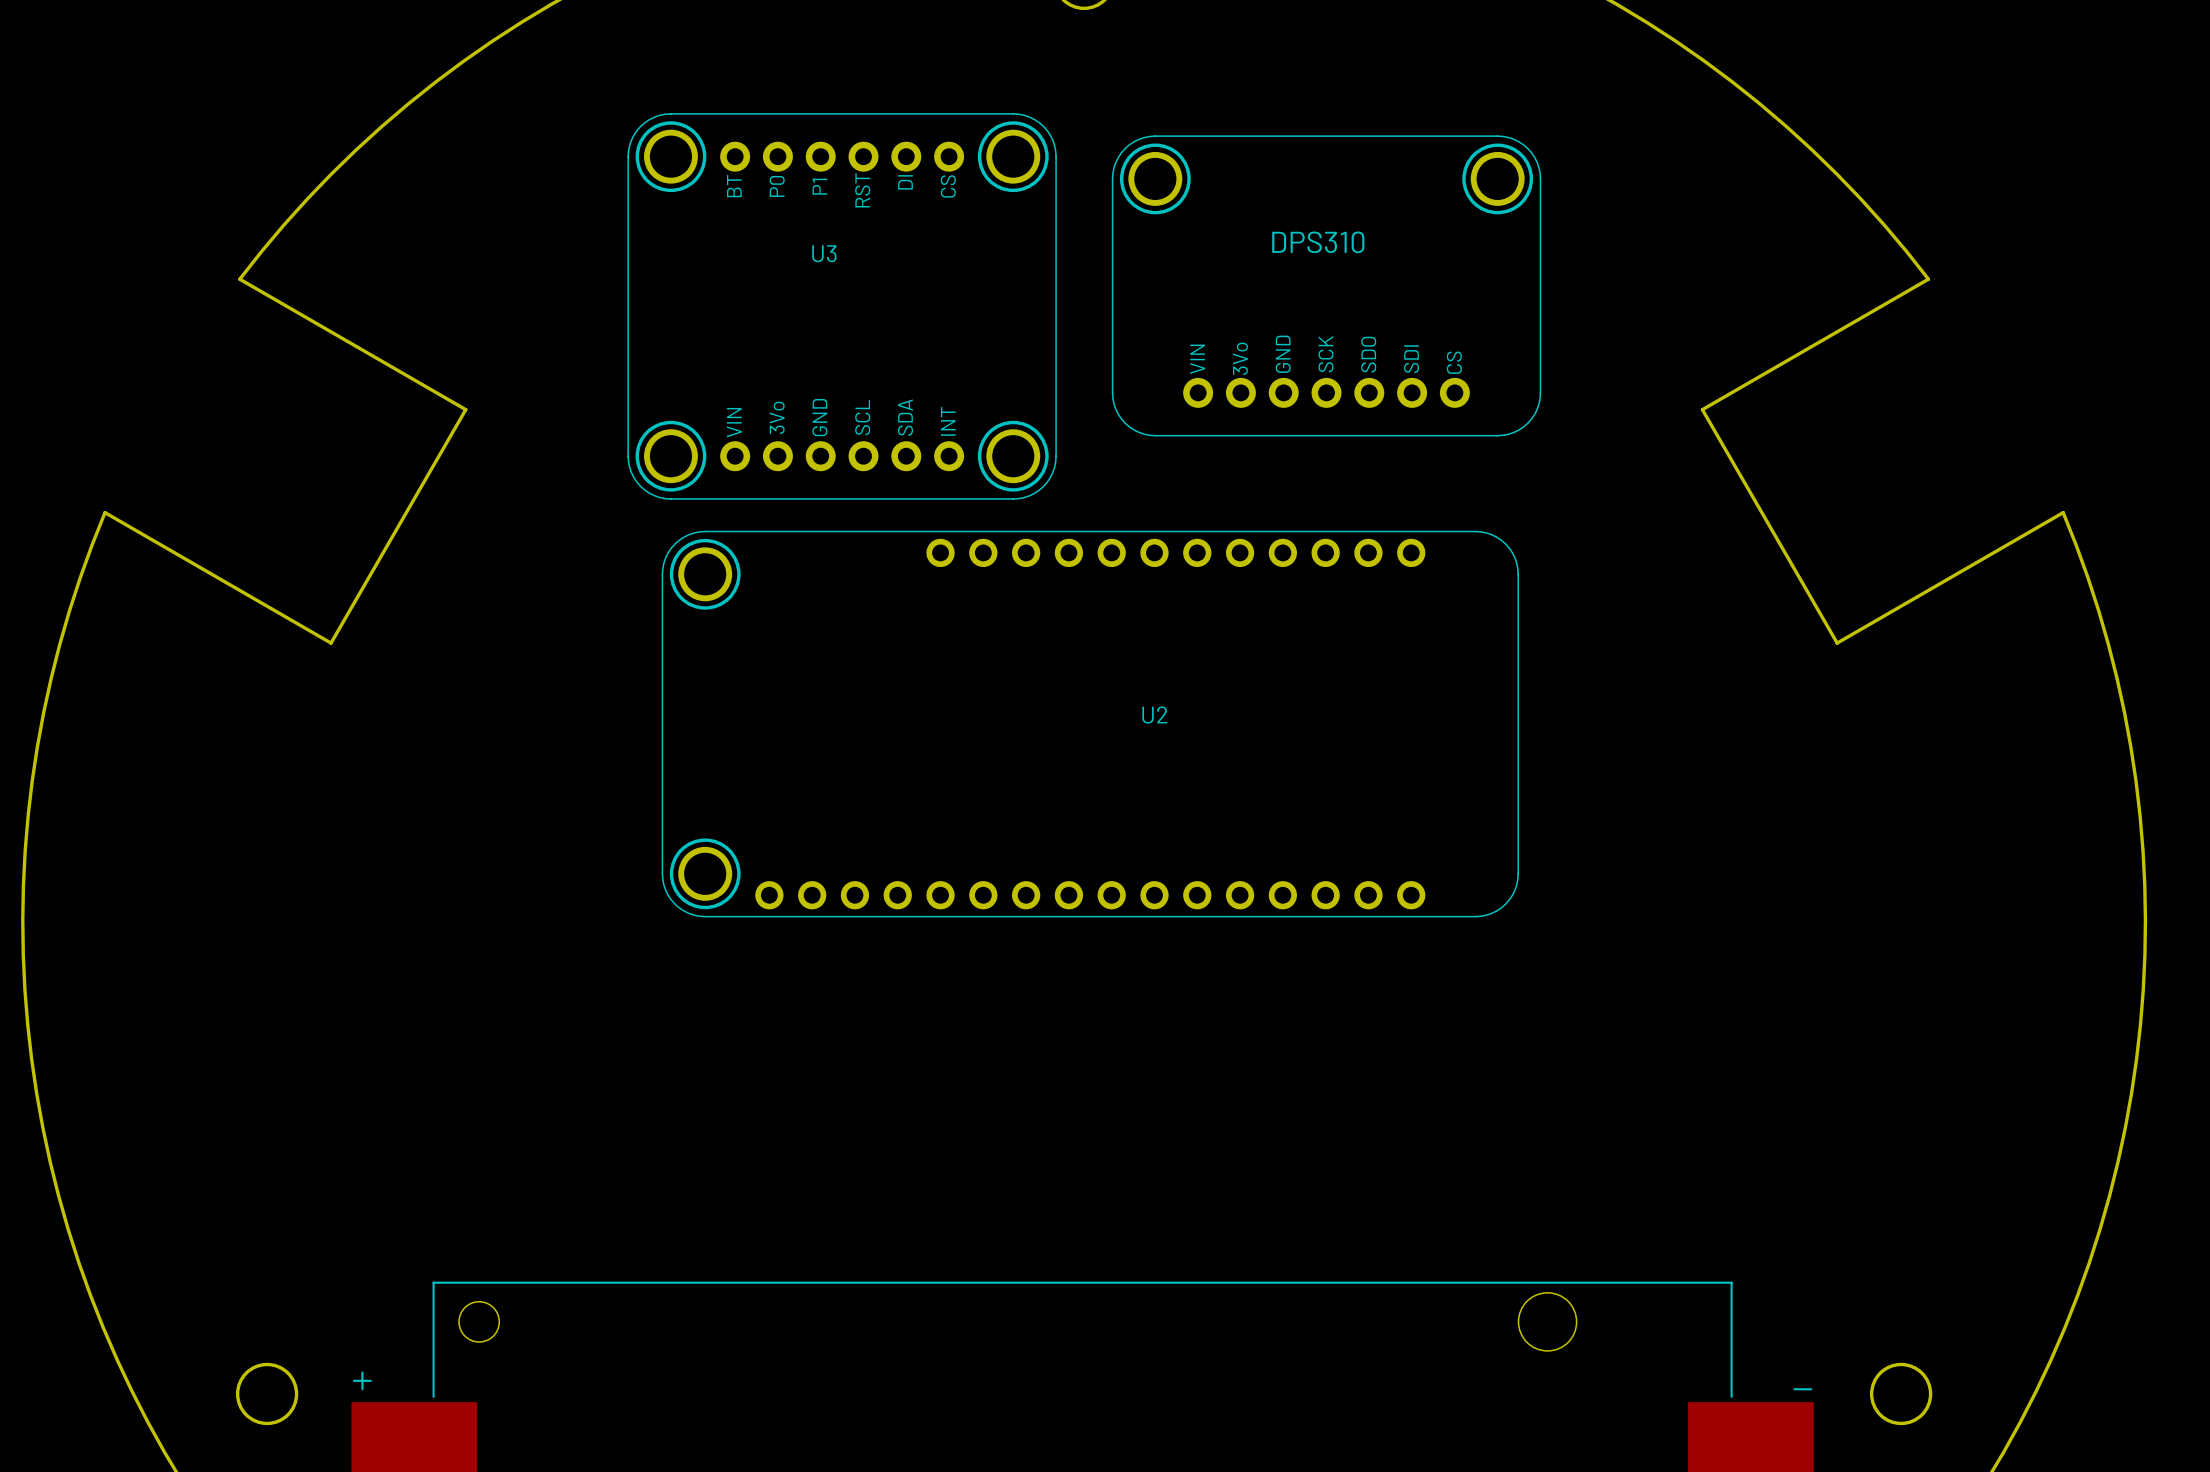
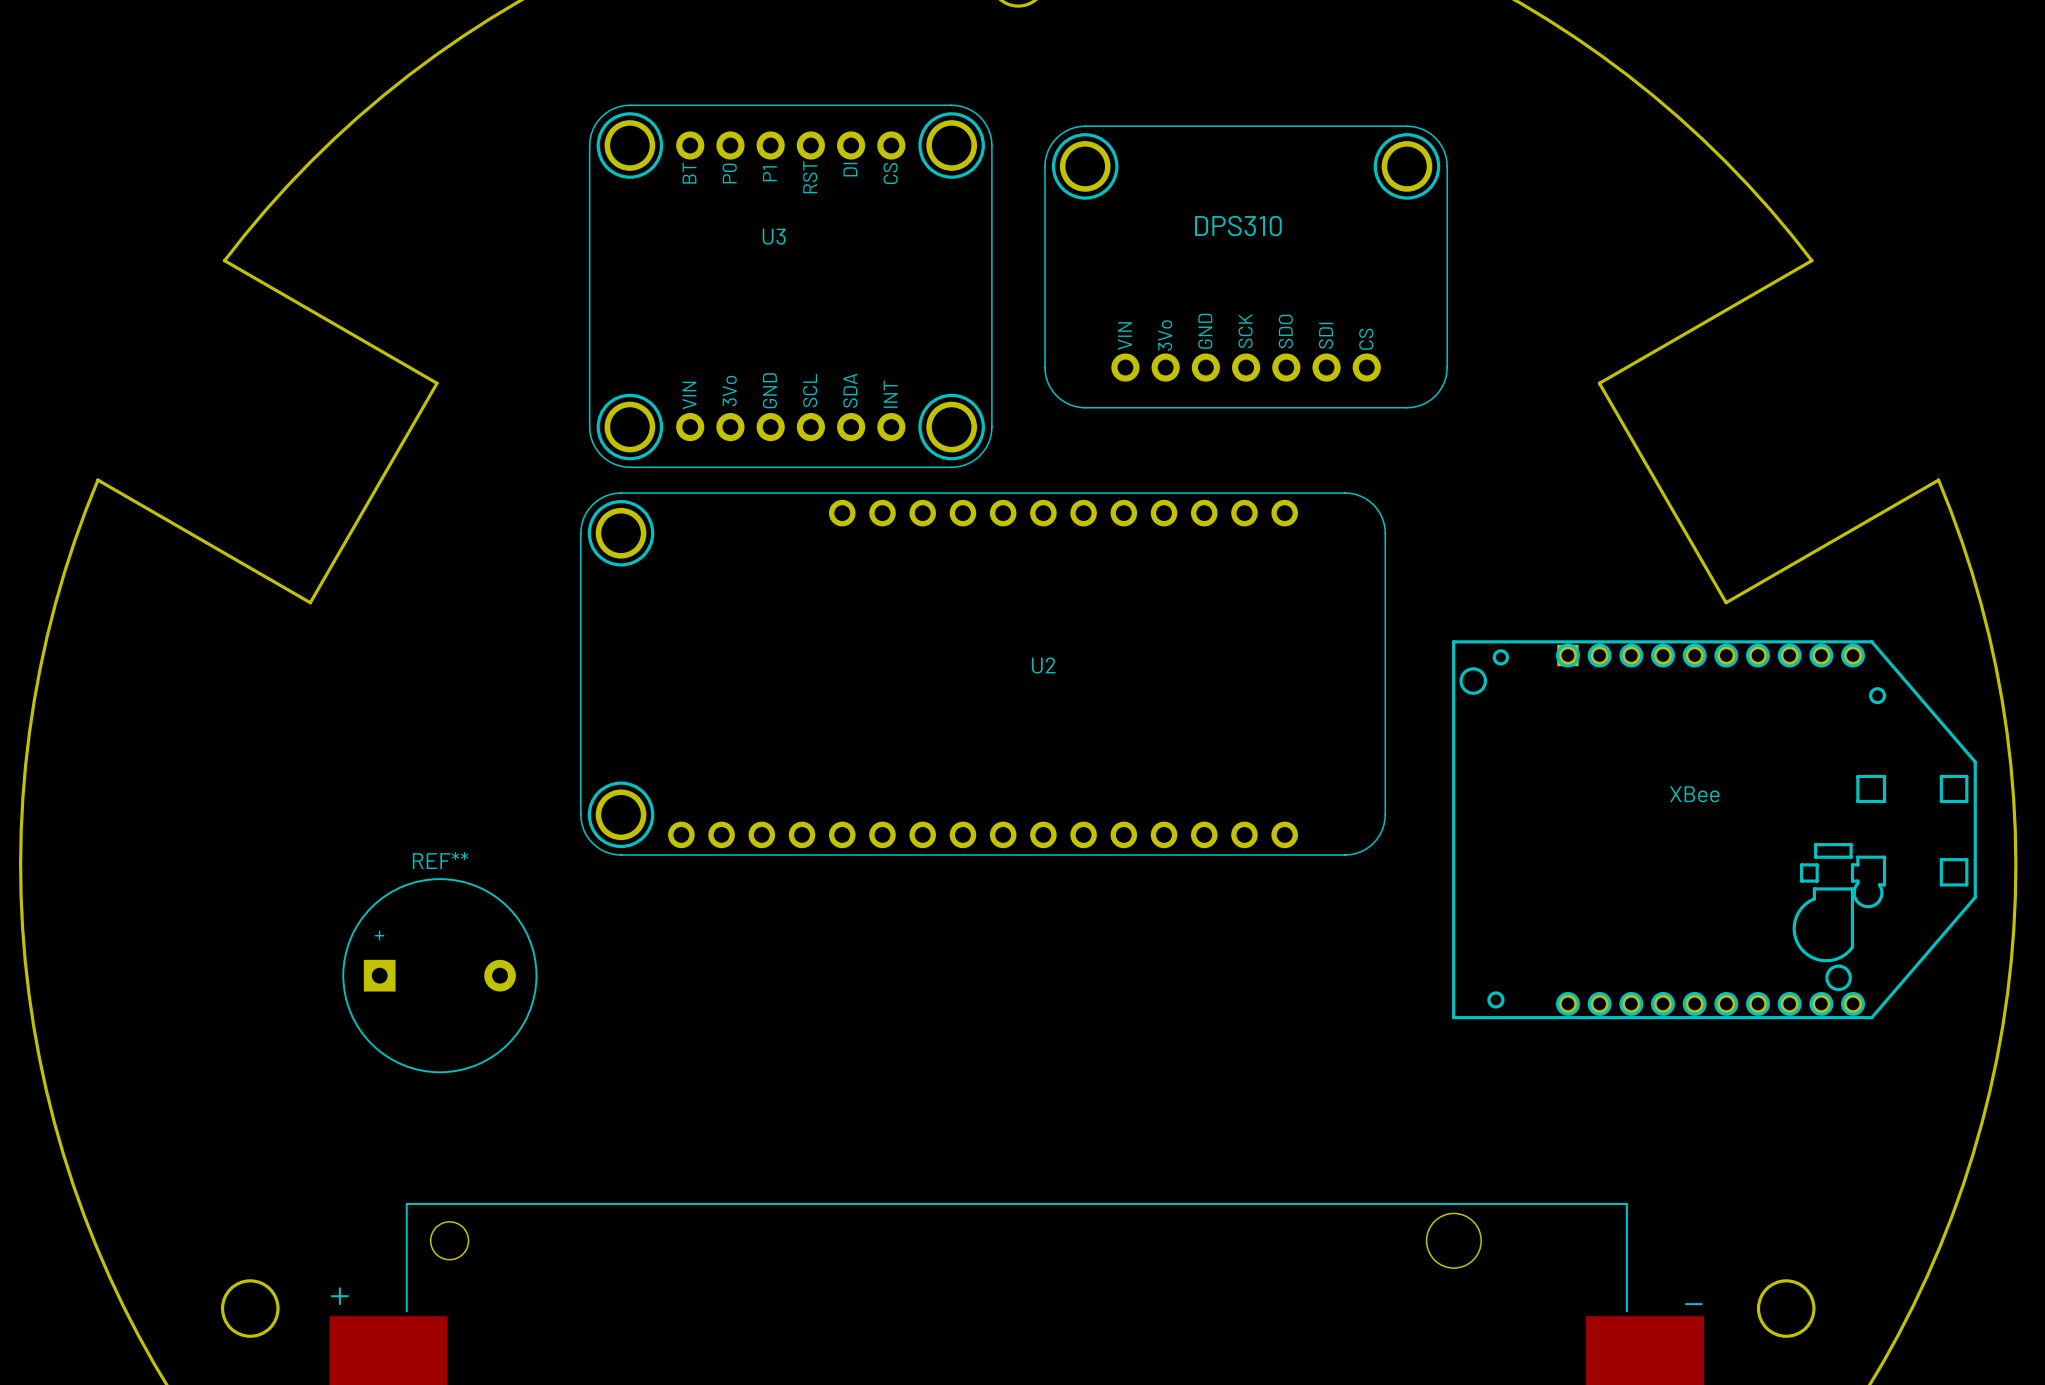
U2 position: (1090, 724) -> (983, 674)
XBee: none -> (1714, 829)
REF**: none -> (439, 975)

